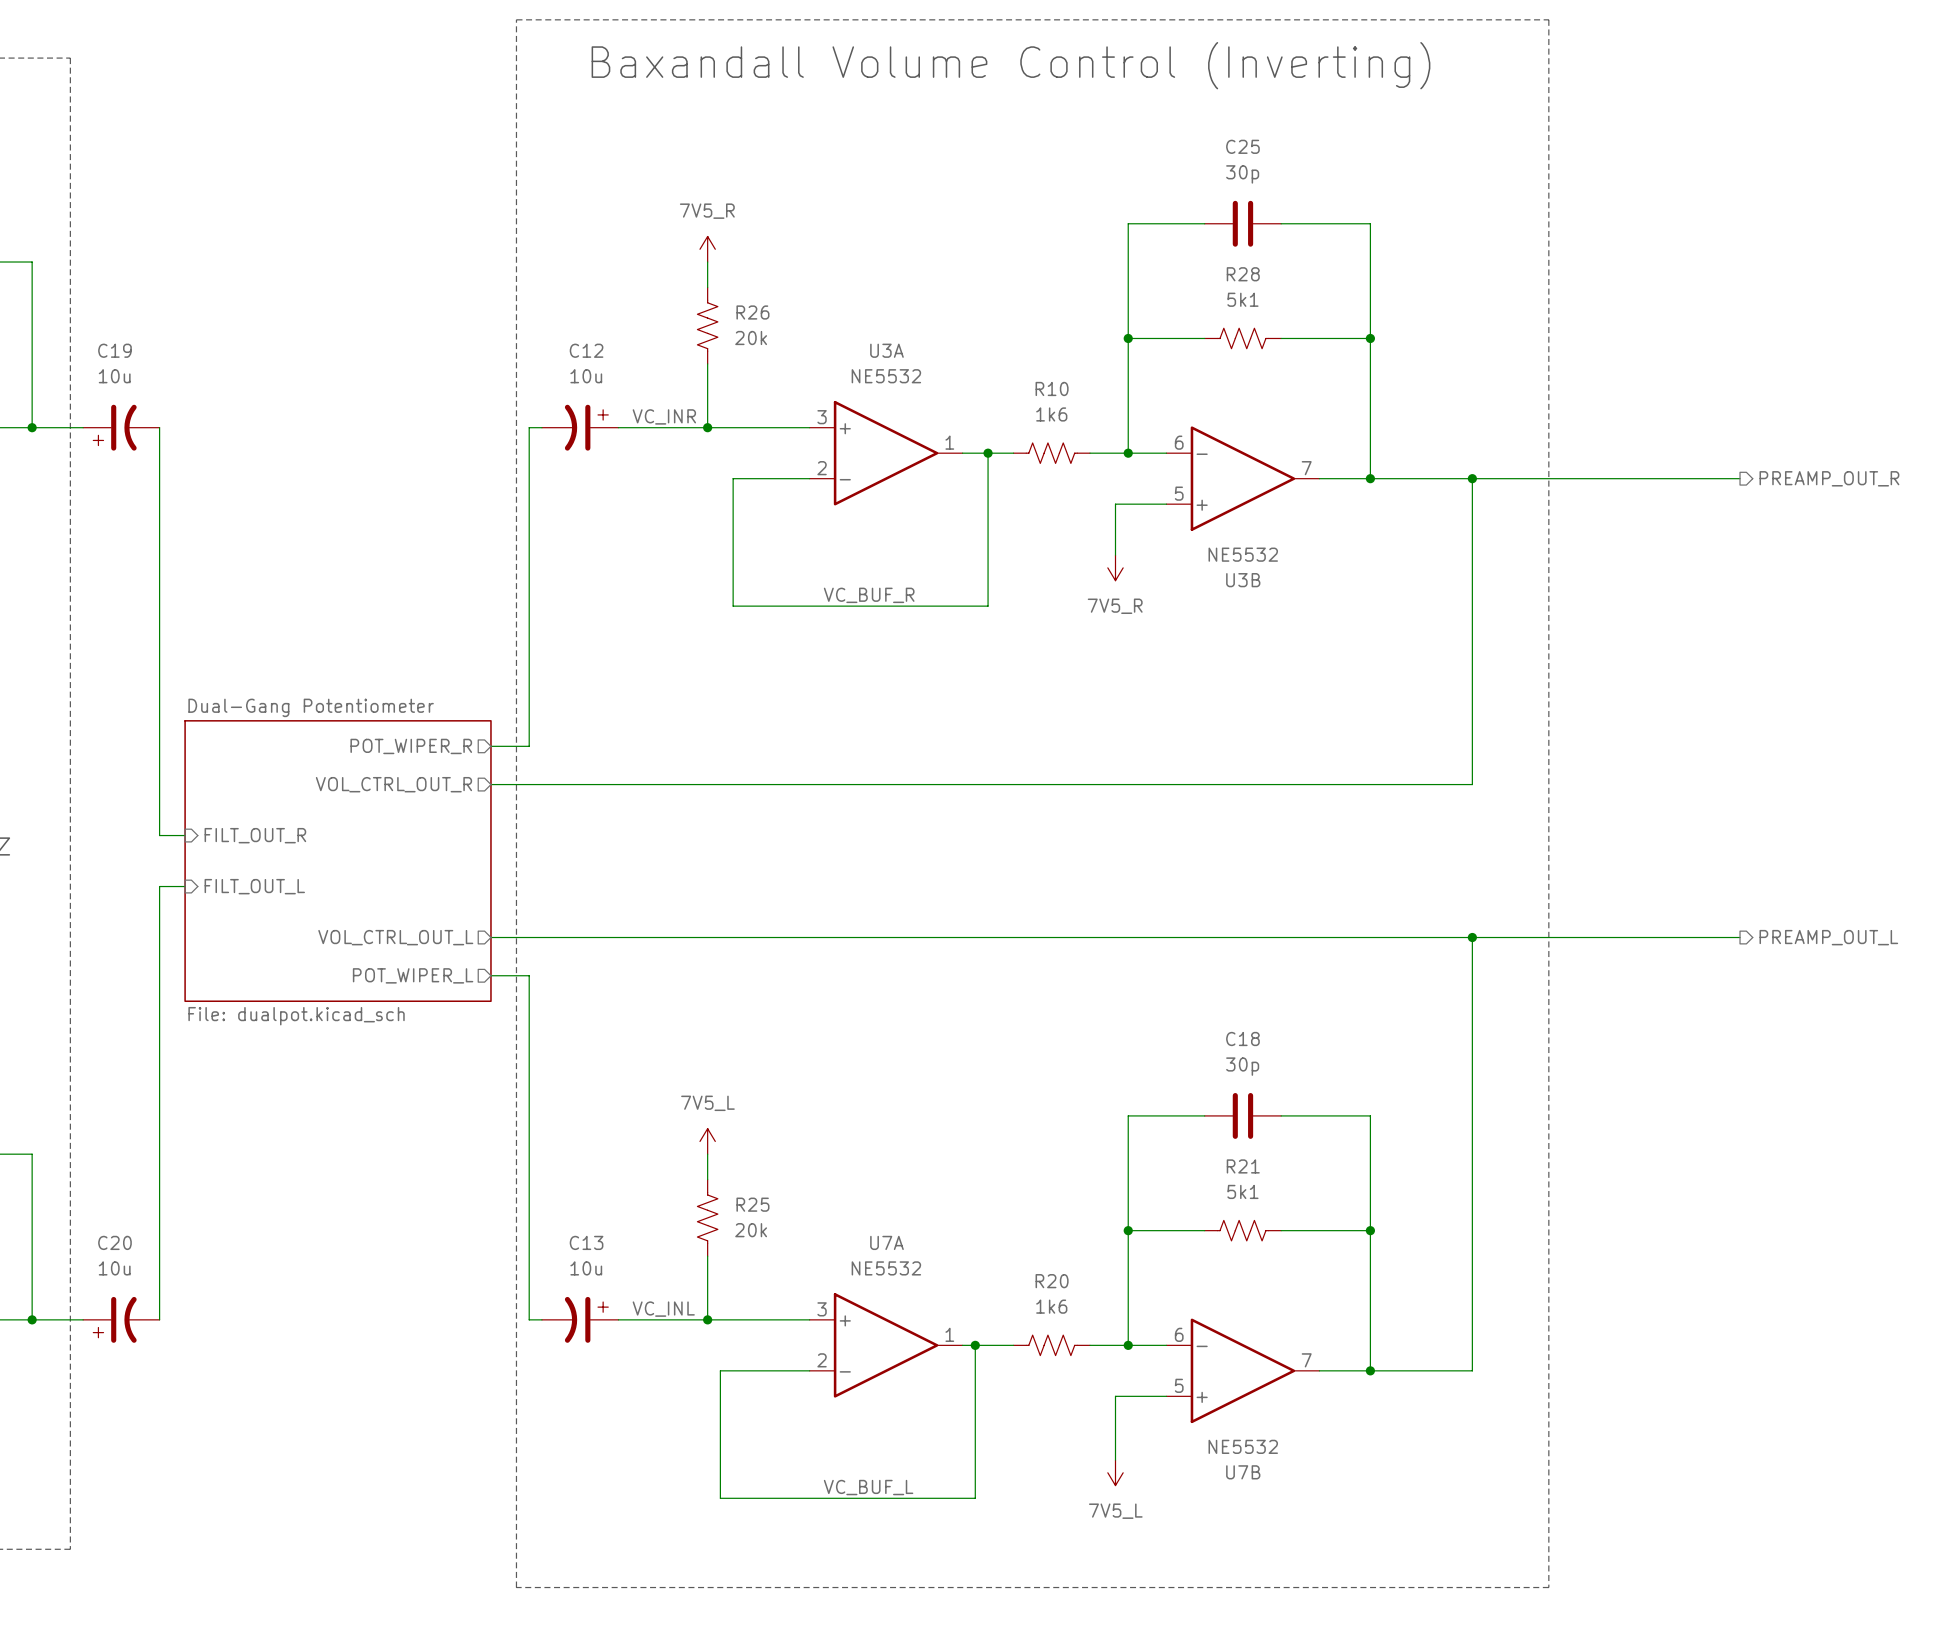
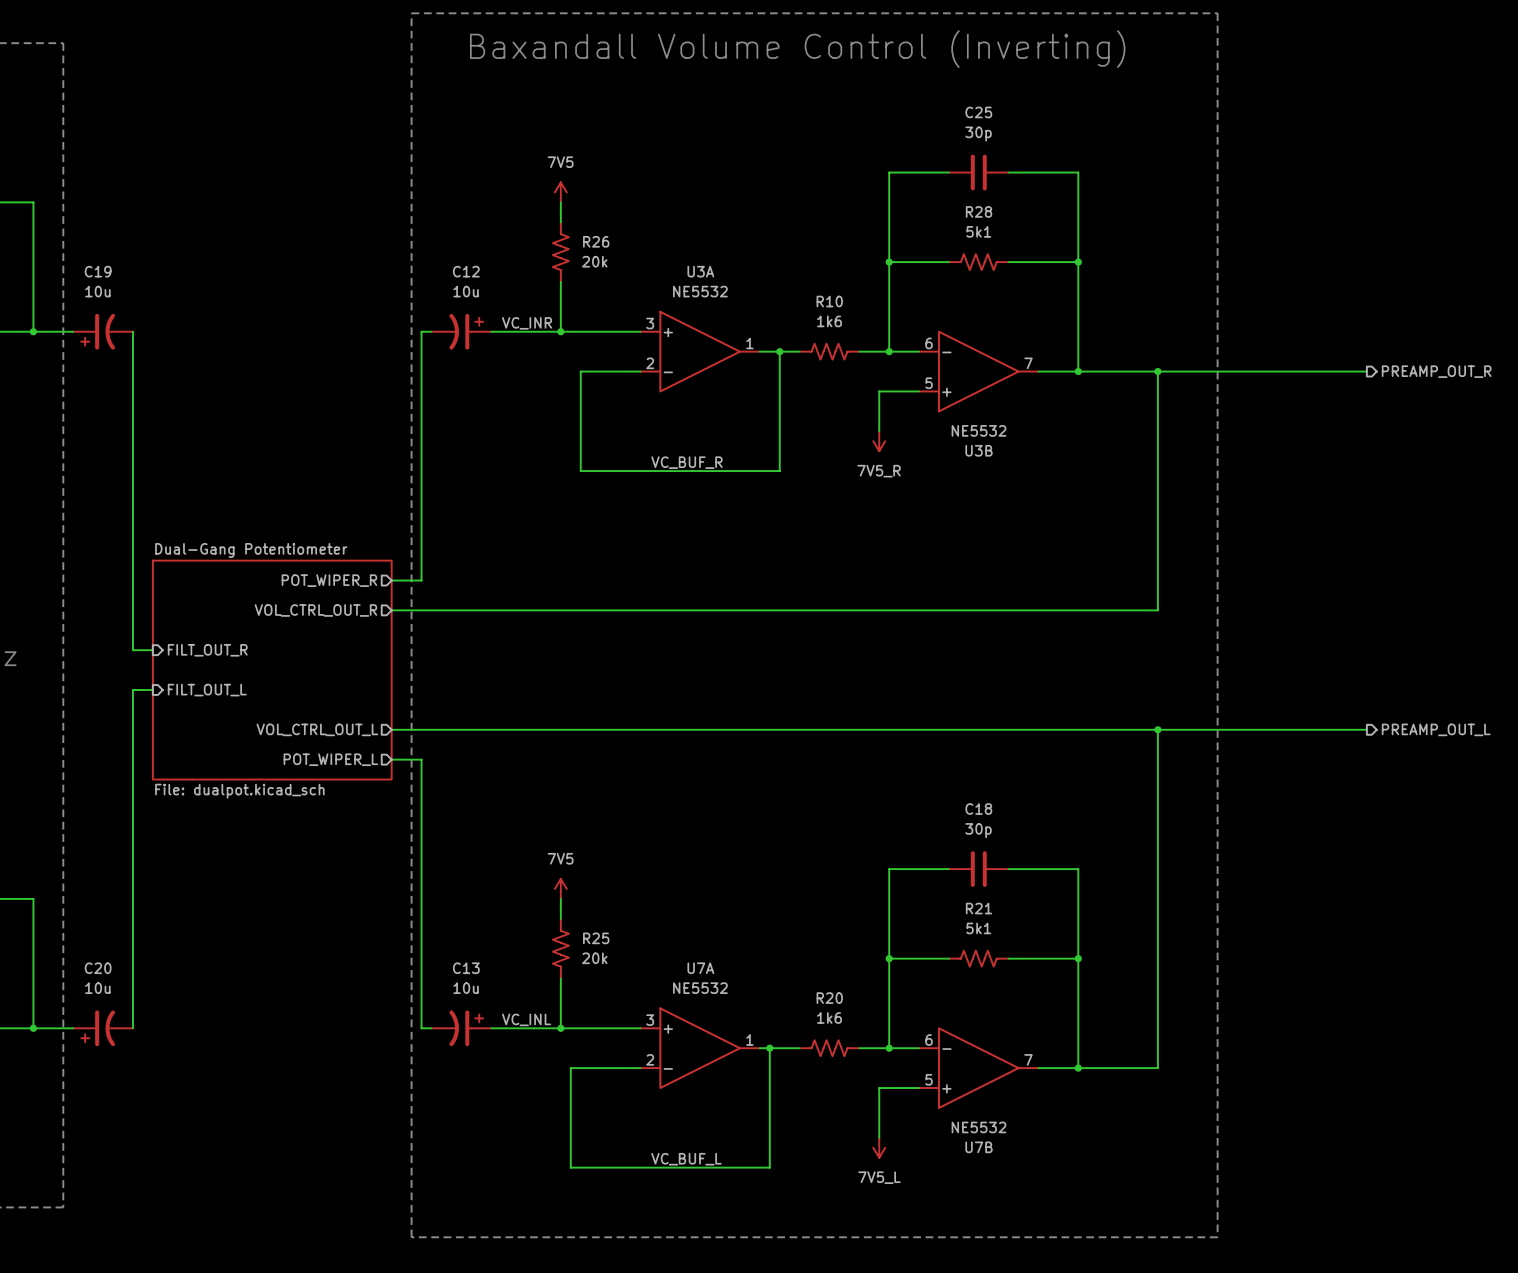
power symbol: 7V5_R (707, 249) -> 7V5 (560, 192)
power symbol: 7V5_L (707, 1141) -> 7V5 (560, 889)

